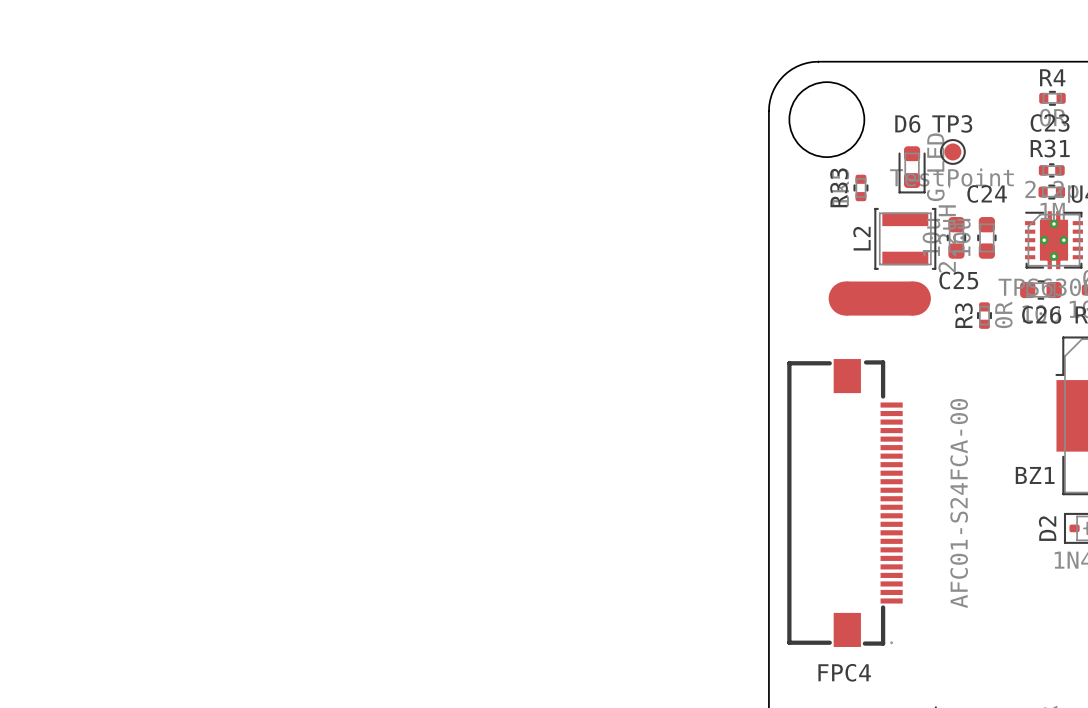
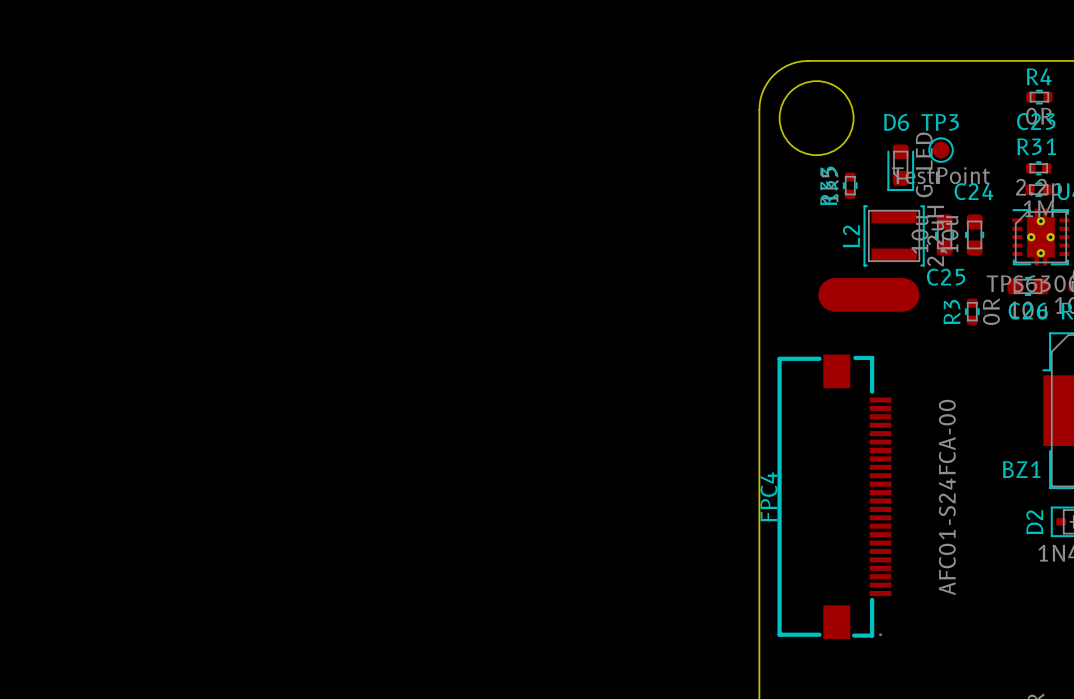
FPC4 name rotation: 0° (844, 672) -> 90° counterclockwise (768, 496)
FPC4 name position: FPC4 (844, 672) -> FPC4 (768, 496)

